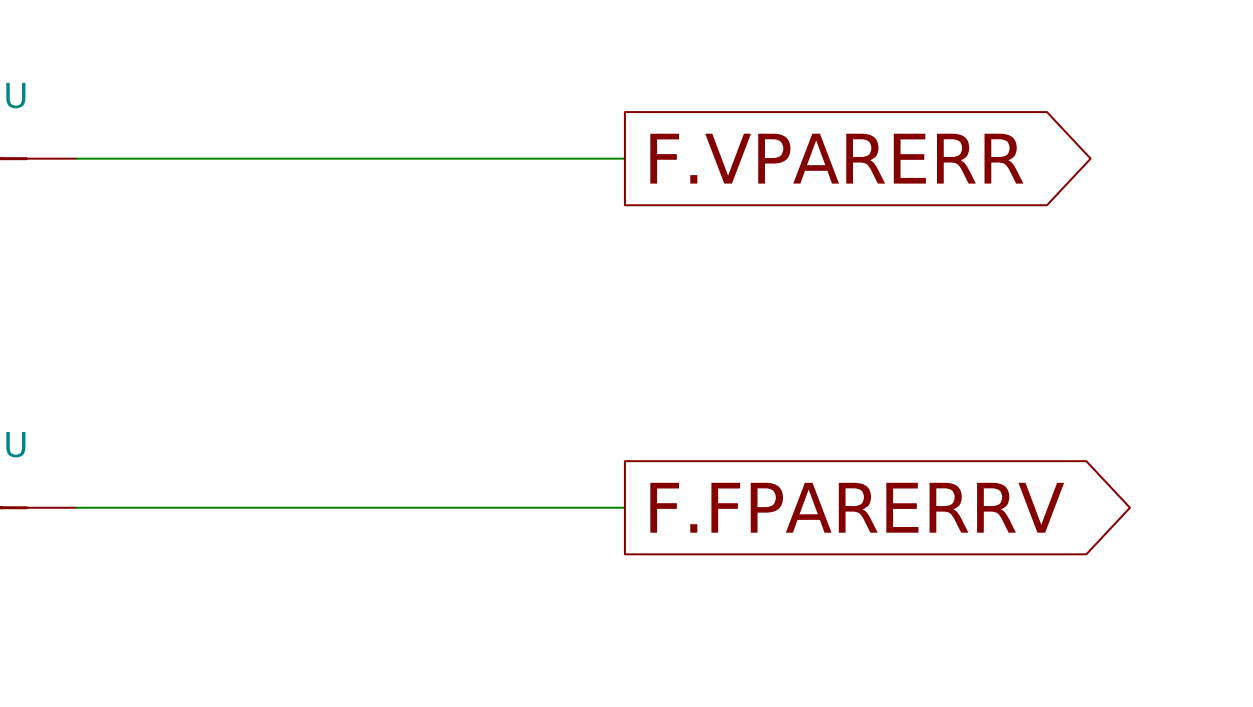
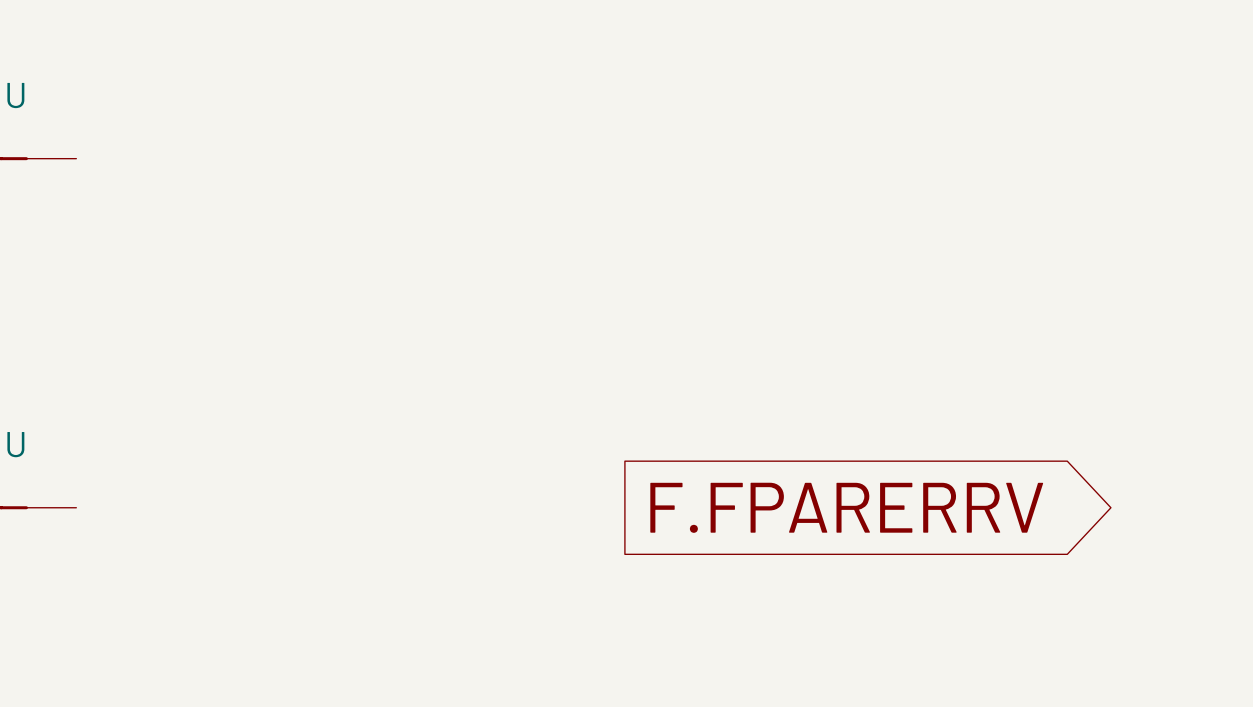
wire: (76, 158) (624, 158) -> none
global label: F.VPARERR (836, 158) -> none
wire: (76, 507) (624, 507) -> none

